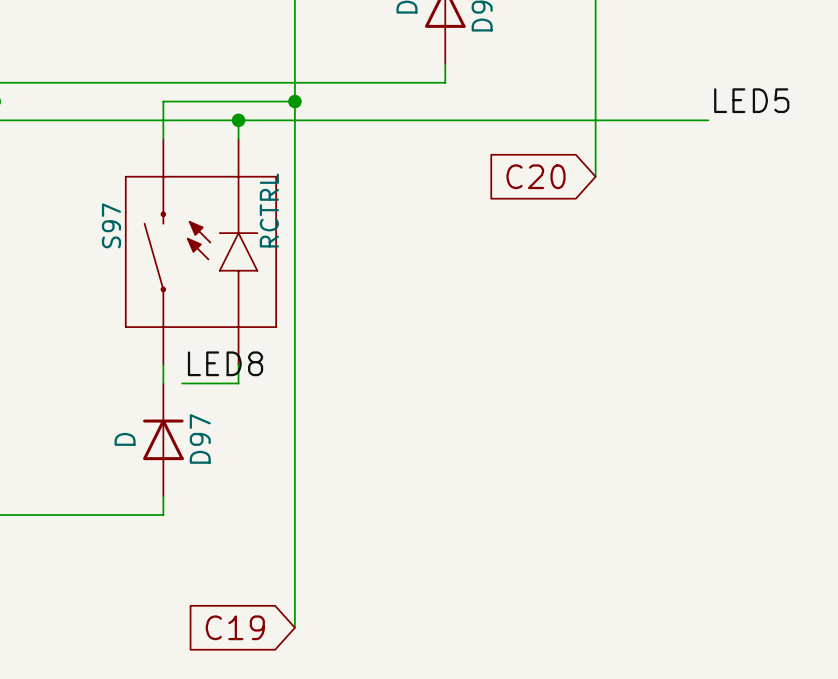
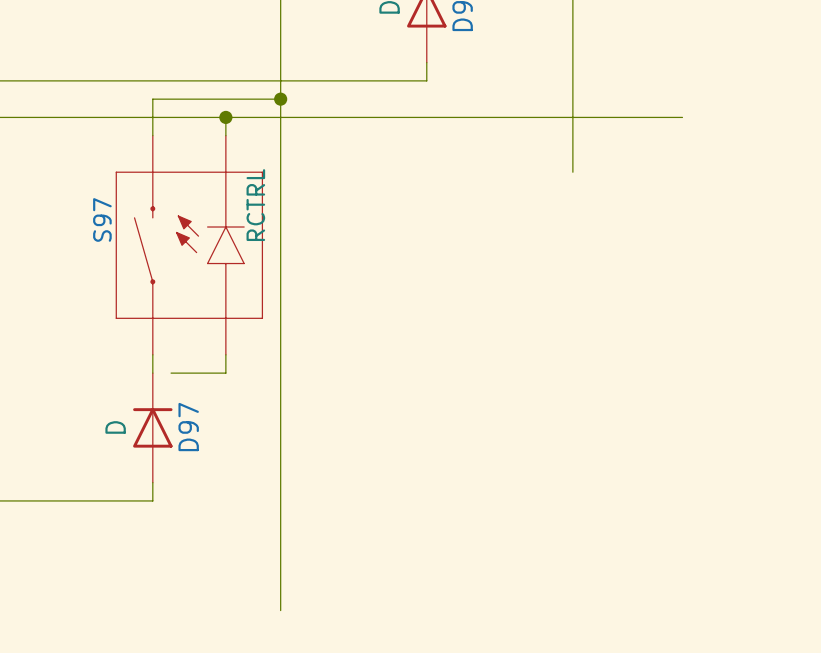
label: LED5 (751, 100) -> none
global label: C20 (536, 176) -> none
label: LED8 (225, 363) -> none
global label: C19 (235, 627) -> none

